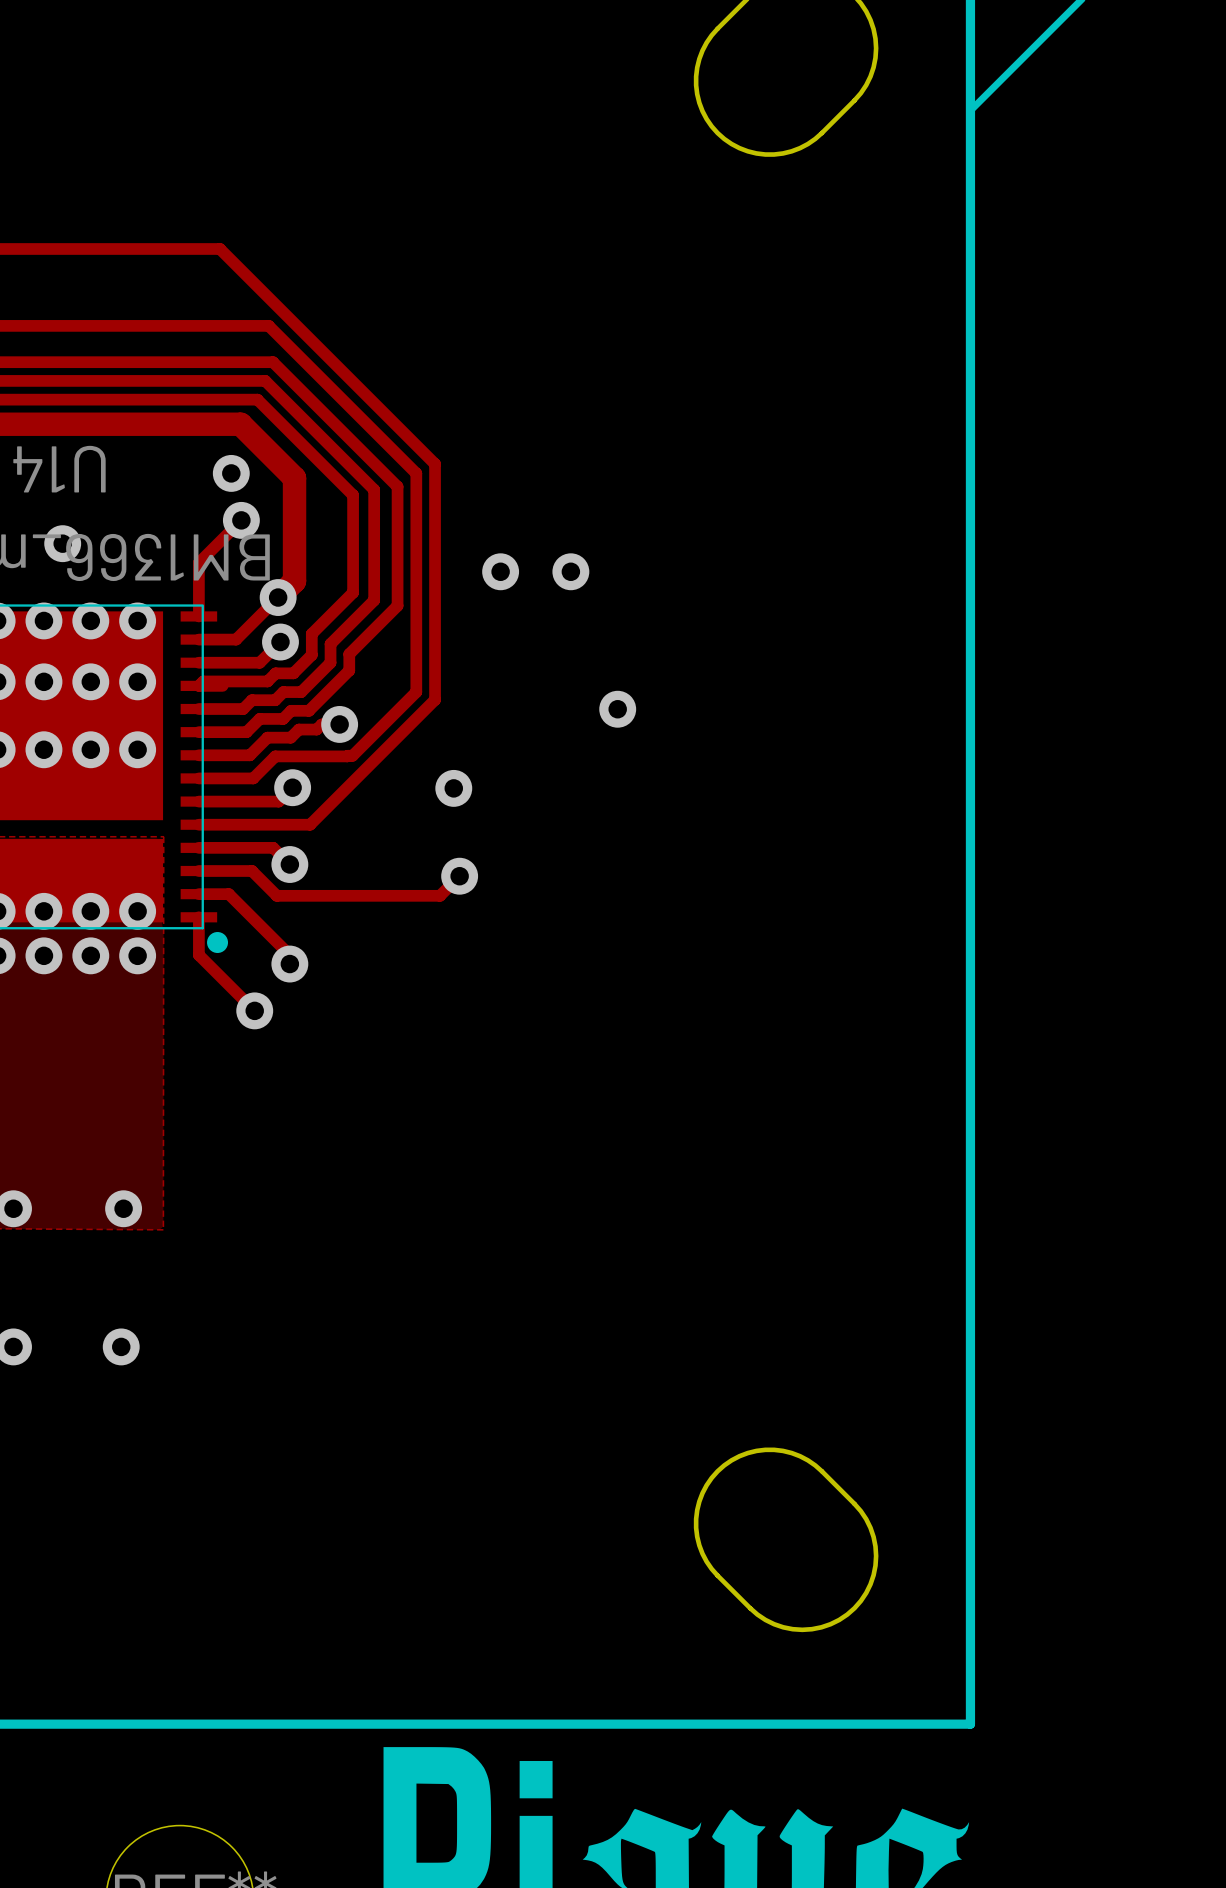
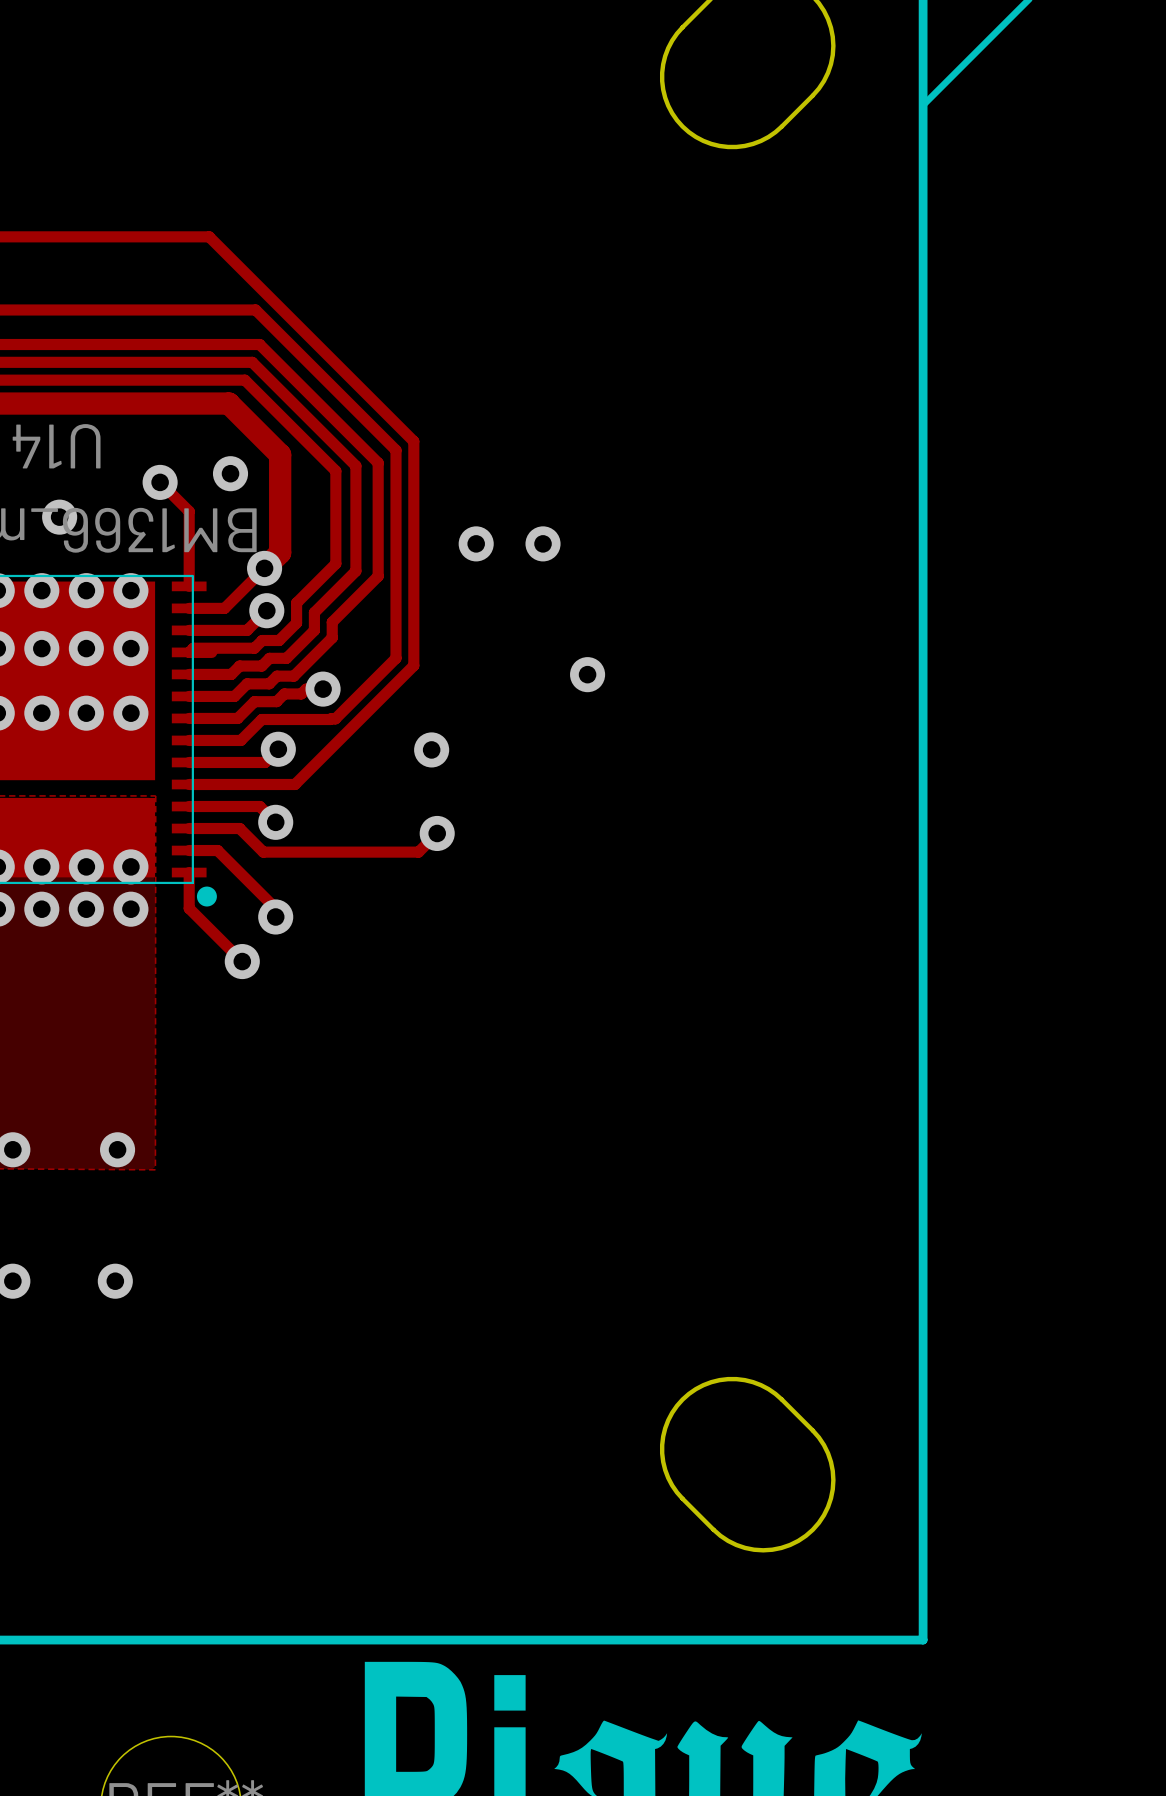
via: (231, 473) -> none
via: none -> (230, 473)
via: none -> (160, 482)
track: (241, 520) (198, 562) -> (160, 482) (189, 511) (189, 535)
via: (241, 520) -> none

